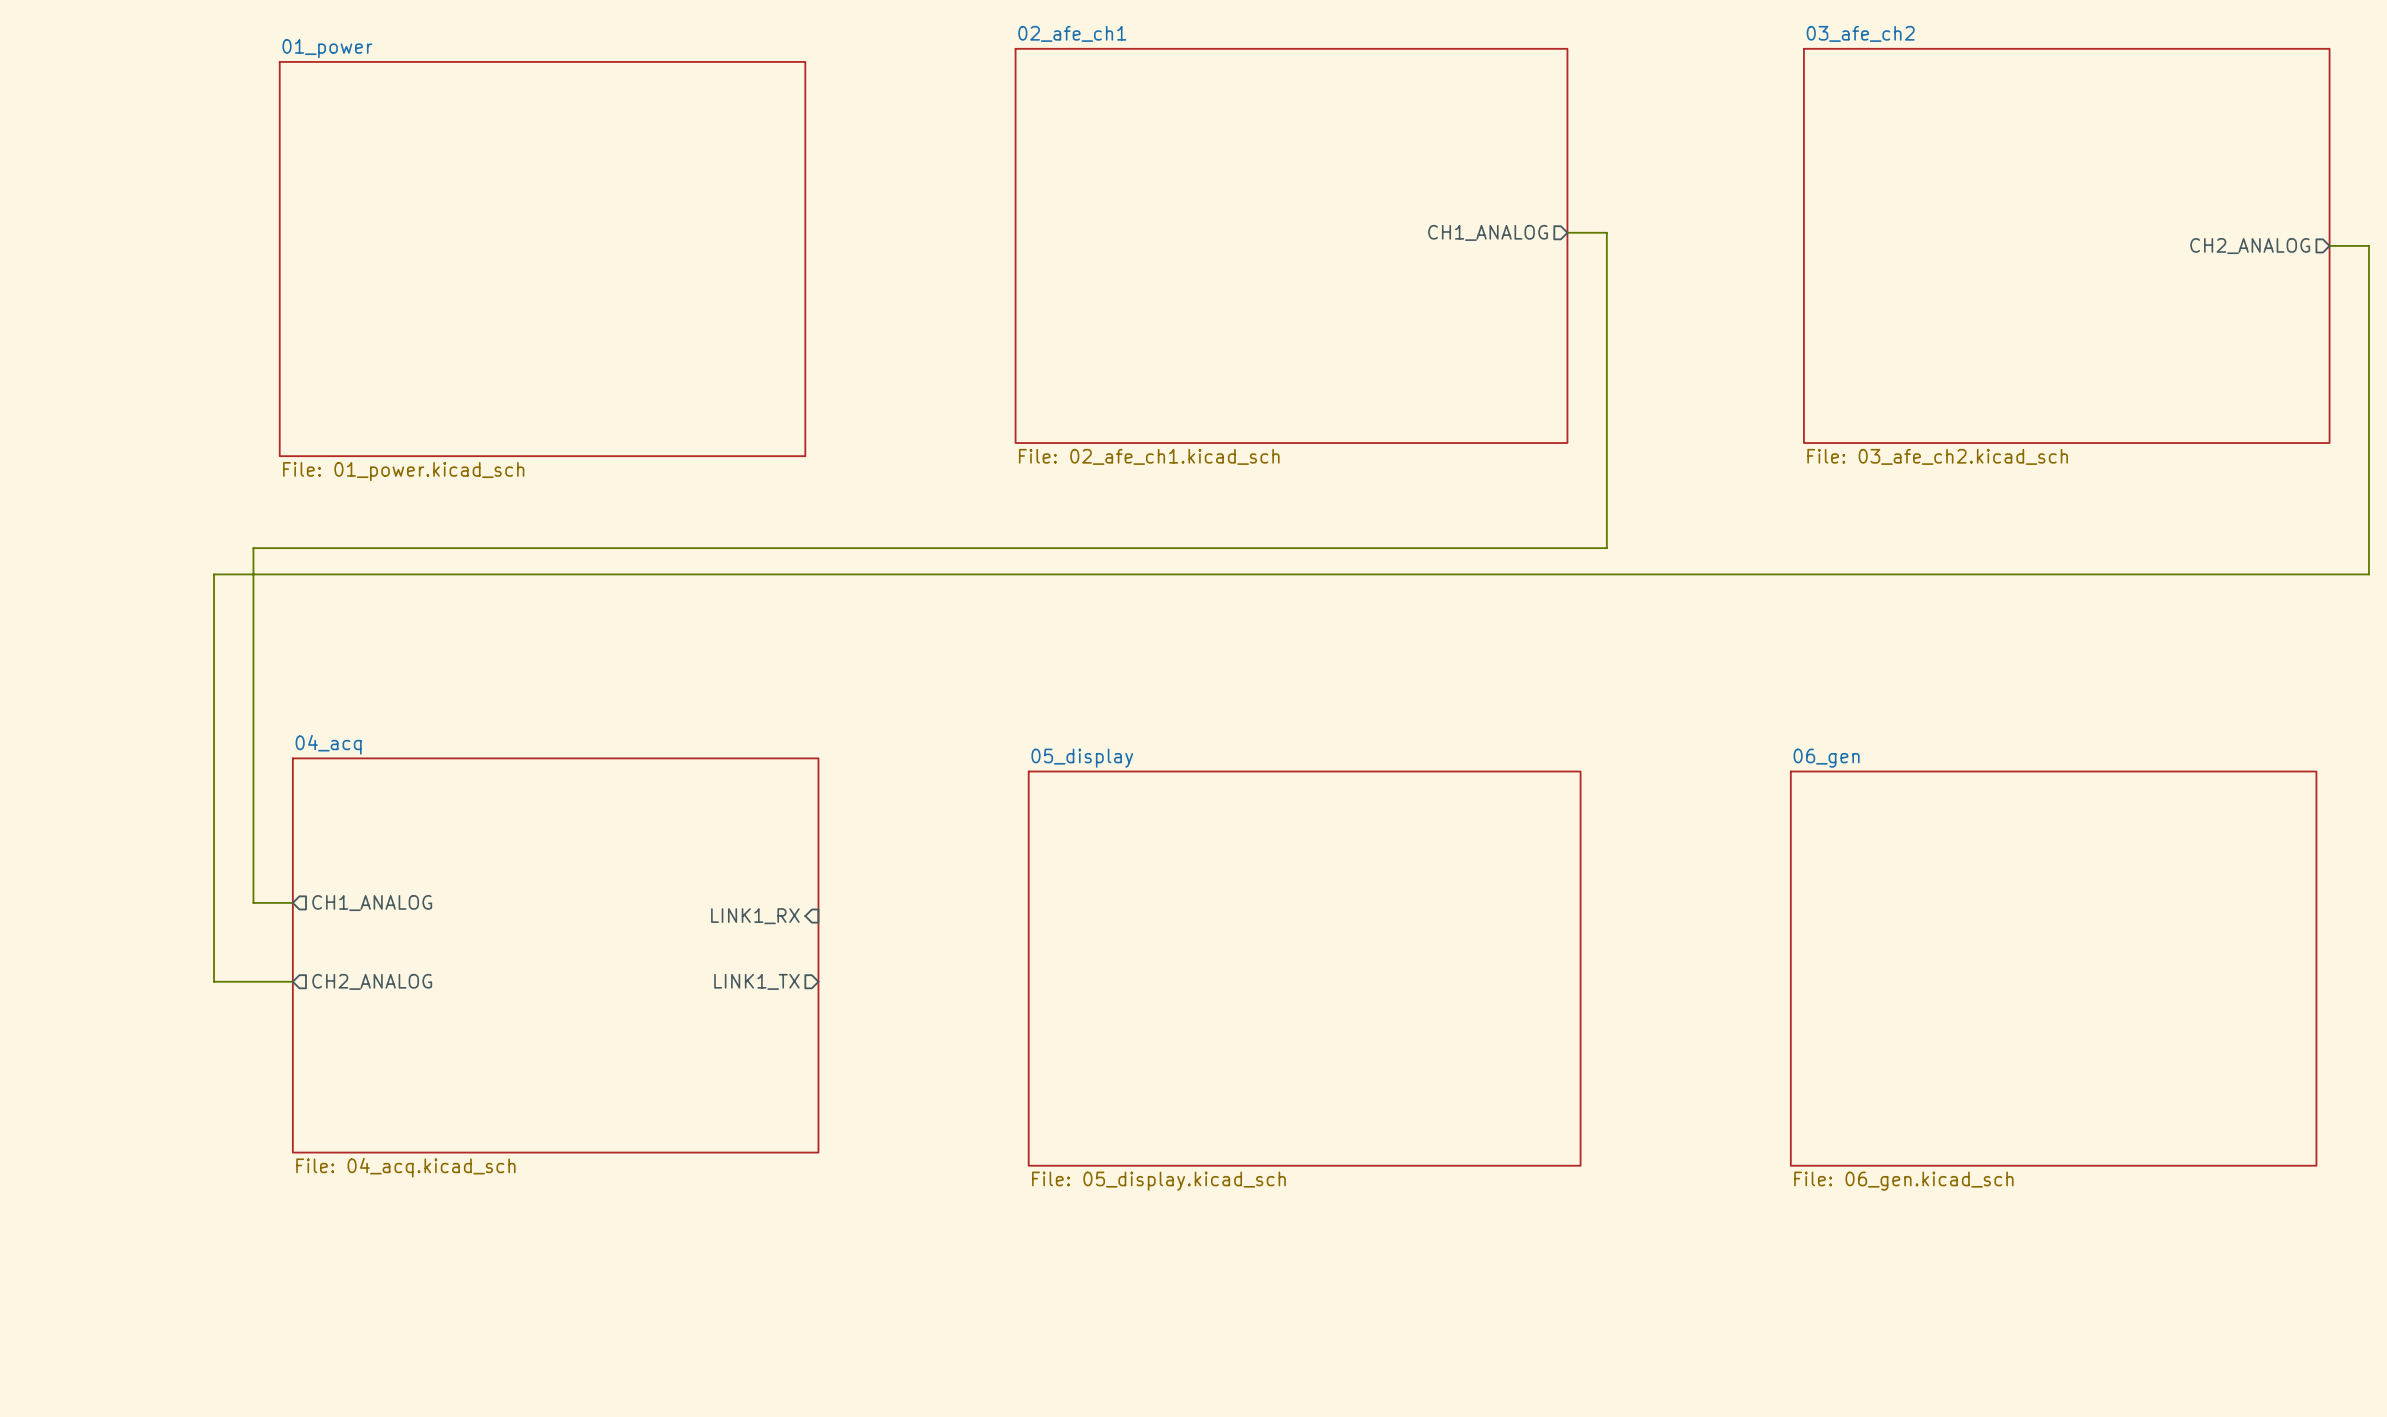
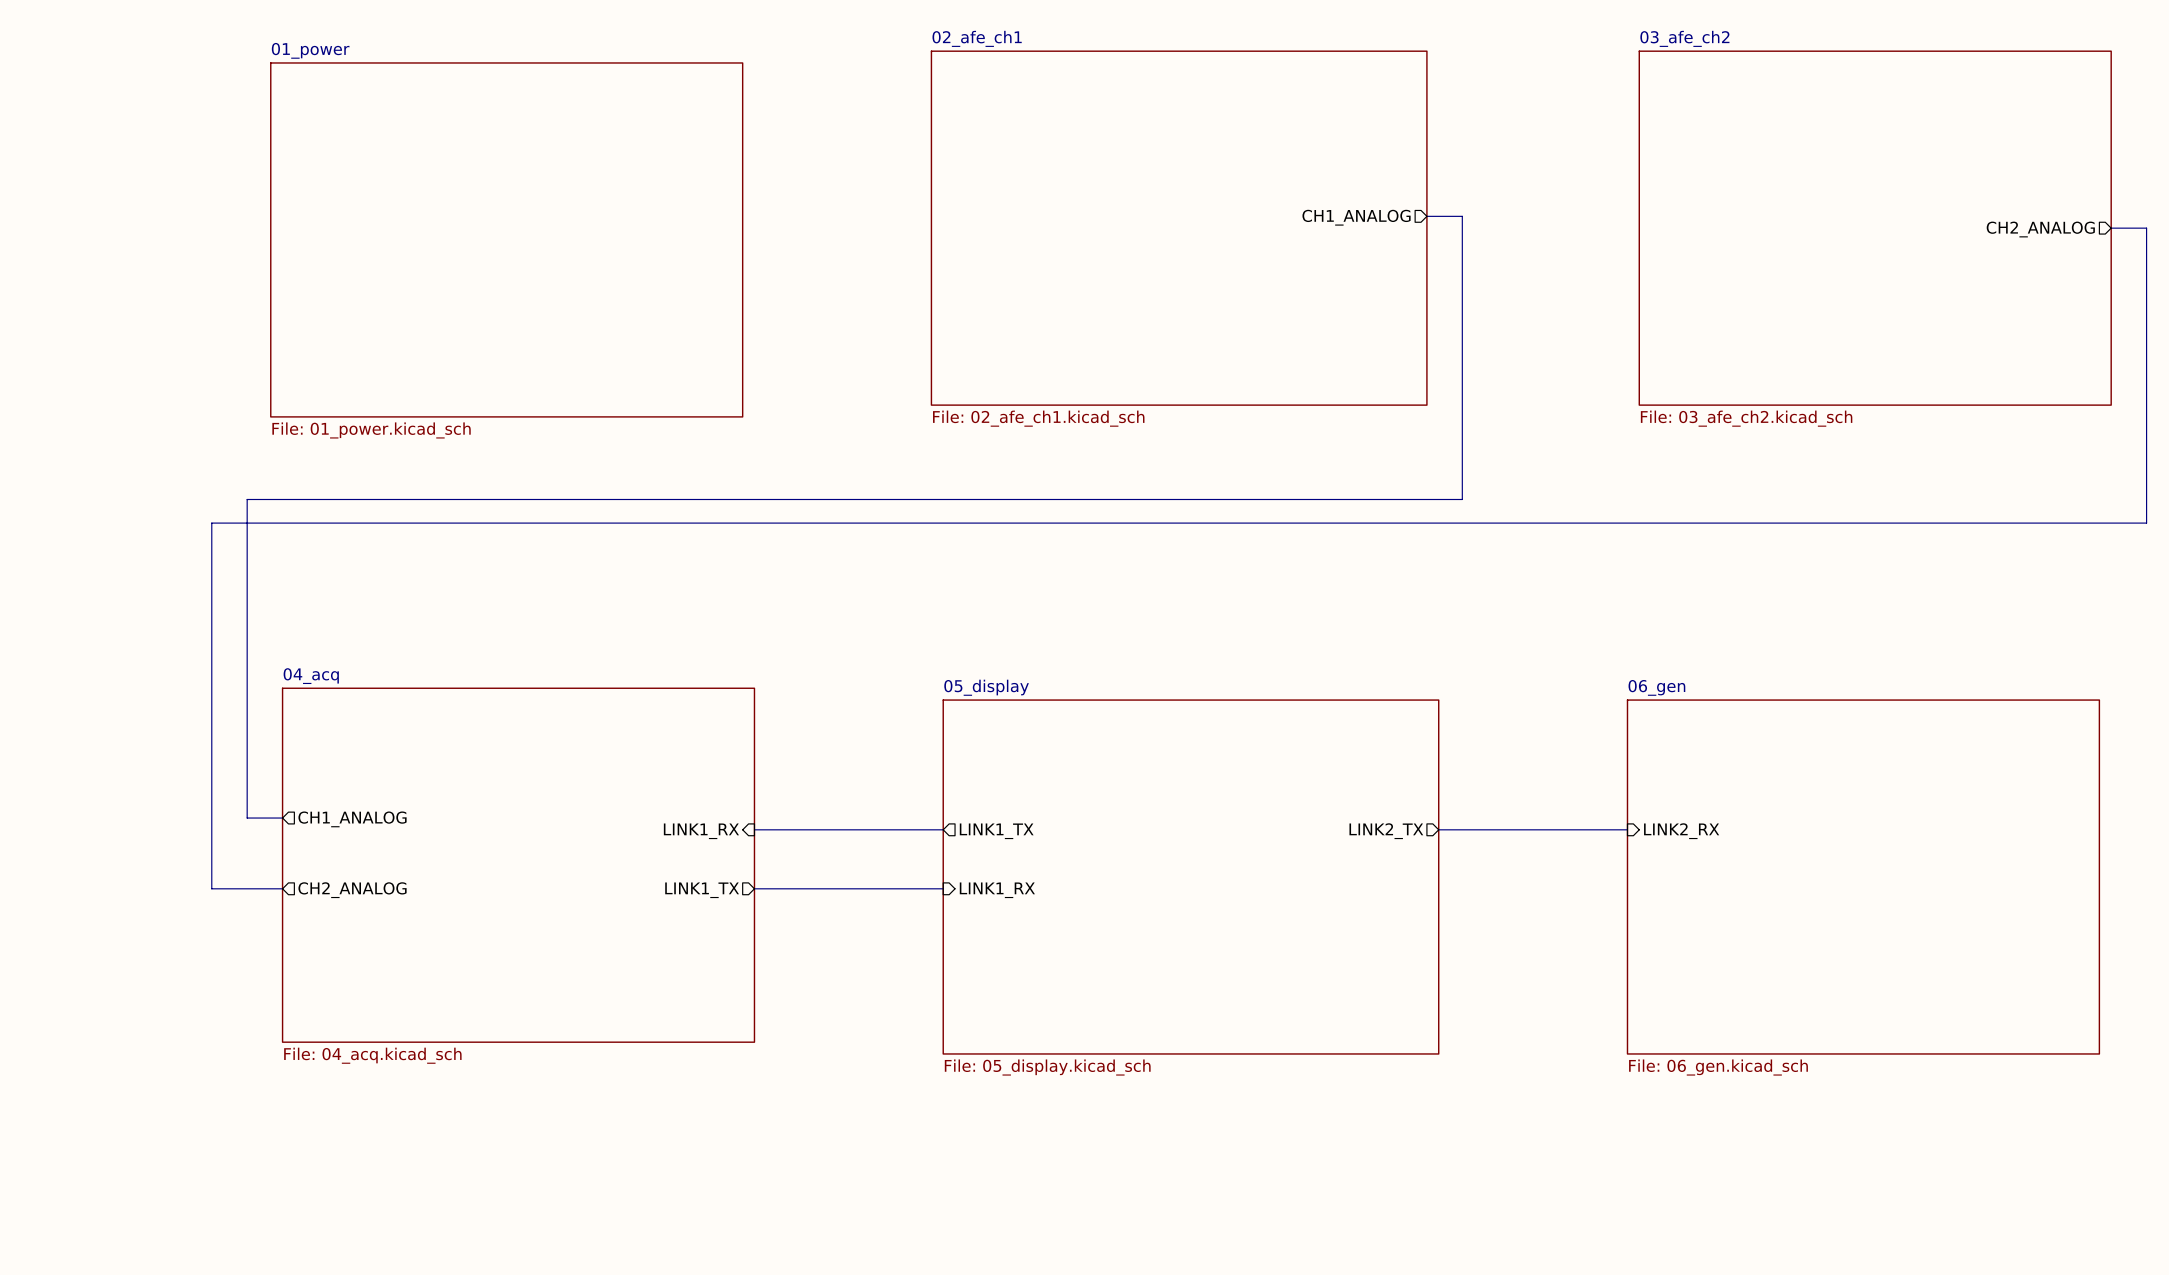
wire: none -> (754, 829) (943, 829)
sheet pin: none -> LINK1_TX (996, 831)
sheet pin: none -> LINK2_TX (1386, 831)
wire: none -> (1438, 829) (1627, 829)
sheet pin: none -> LINK2_RX (1681, 831)
wire: none -> (754, 888) (943, 888)
sheet pin: none -> LINK1_RX (997, 890)

